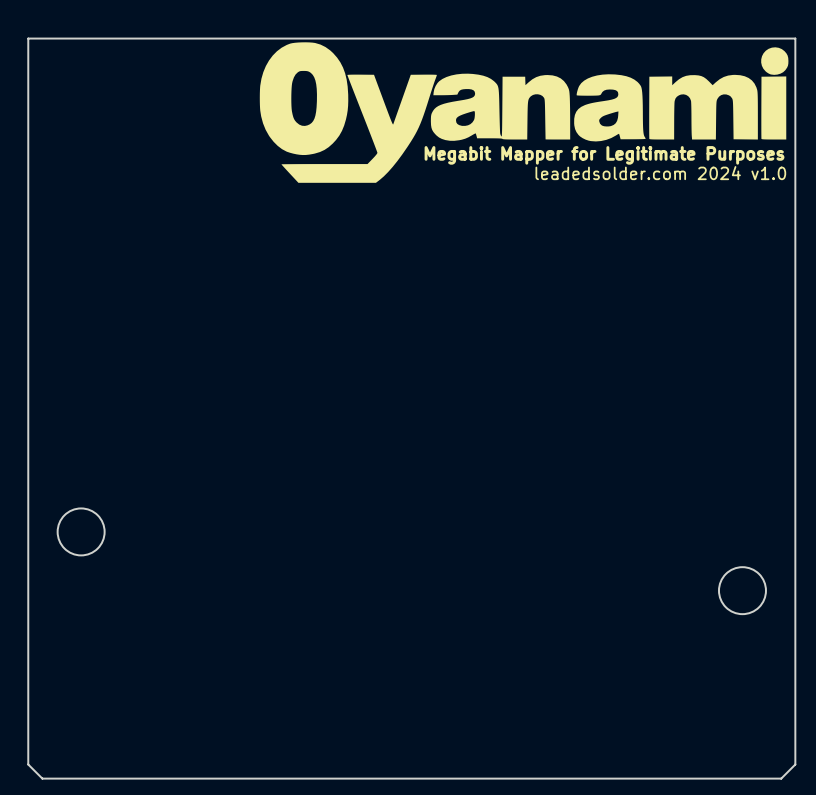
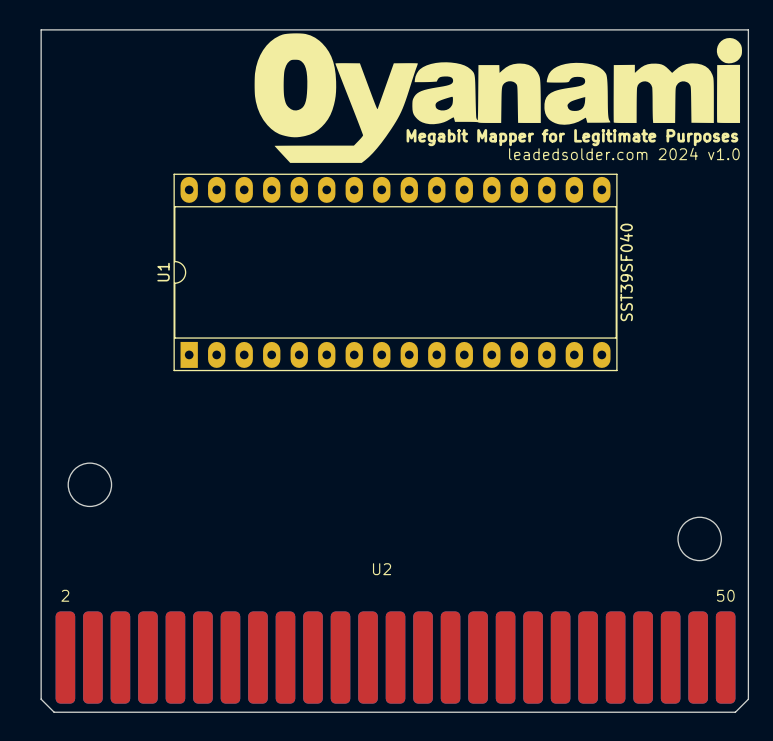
U1: none -> SST39SF040 (395, 272)
U2: none -> (395, 657)

